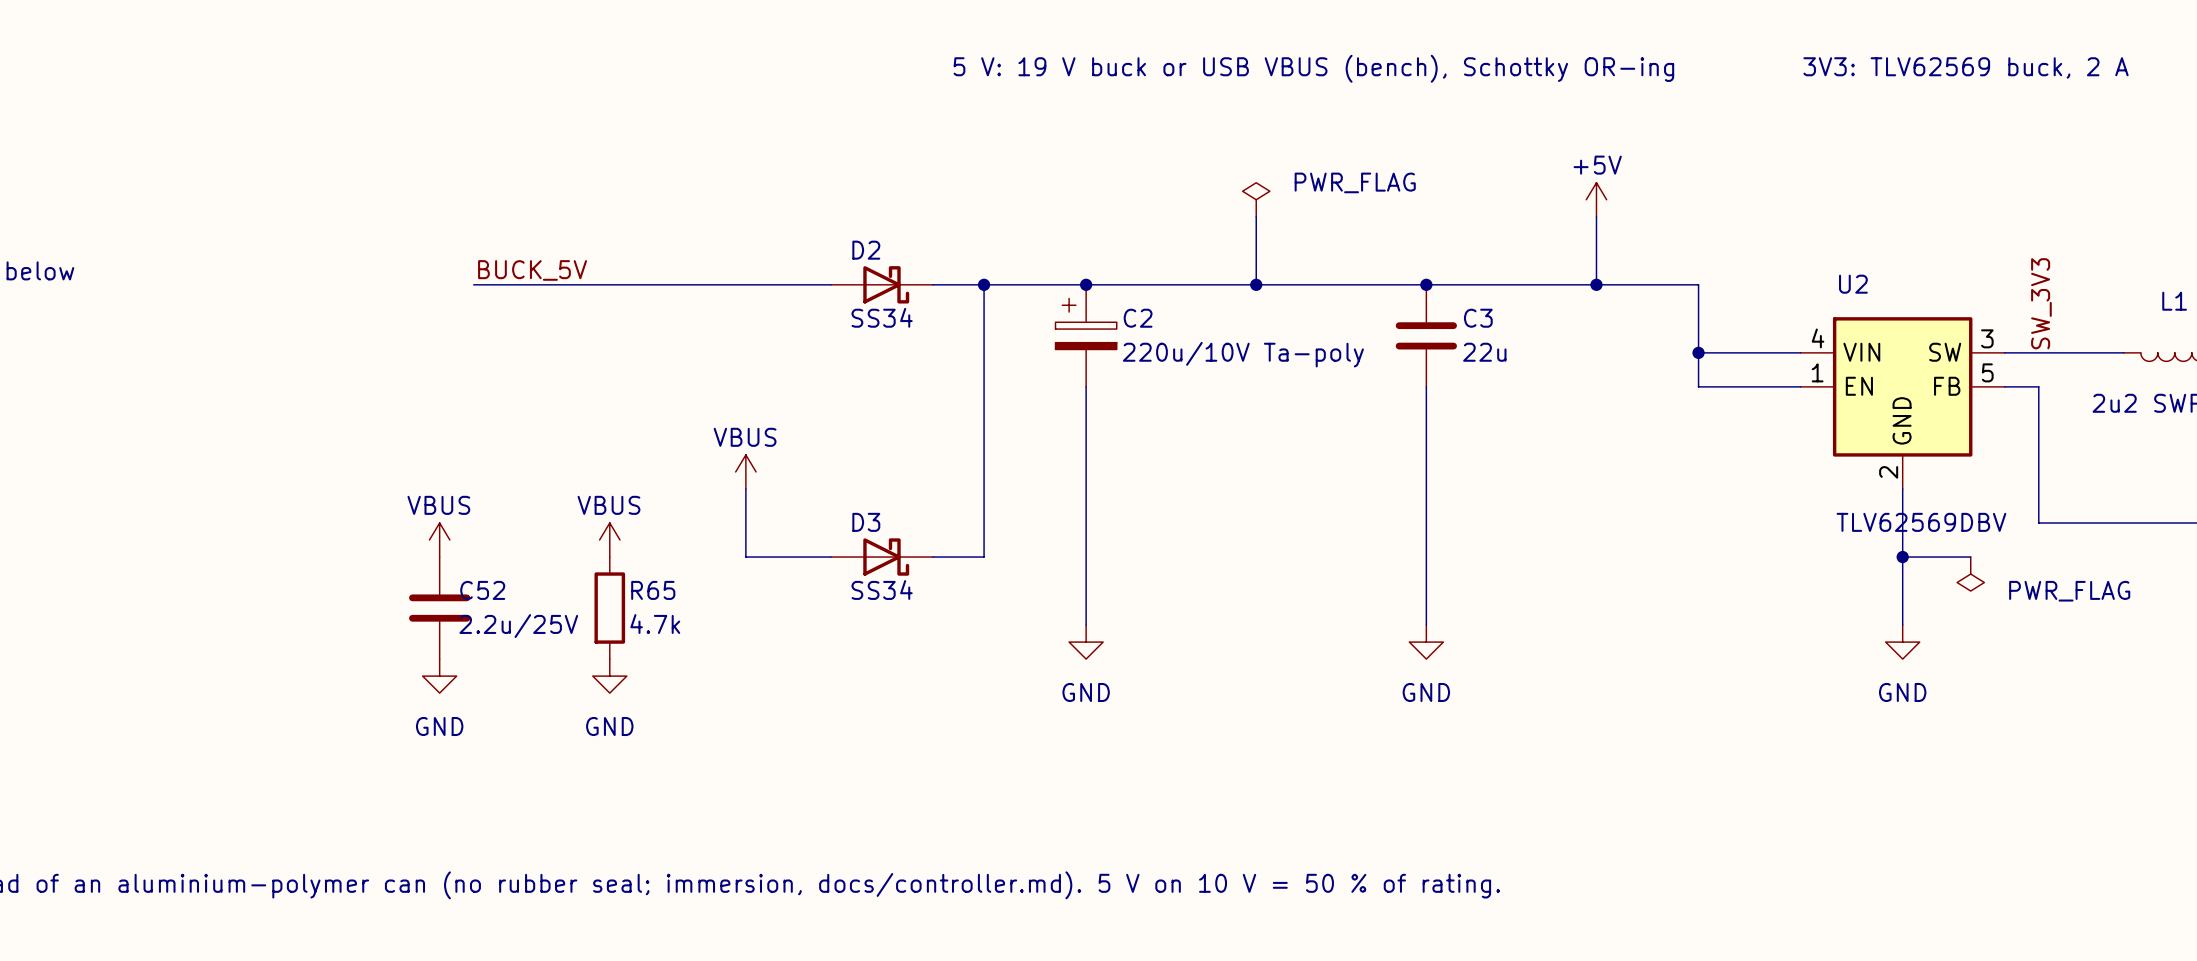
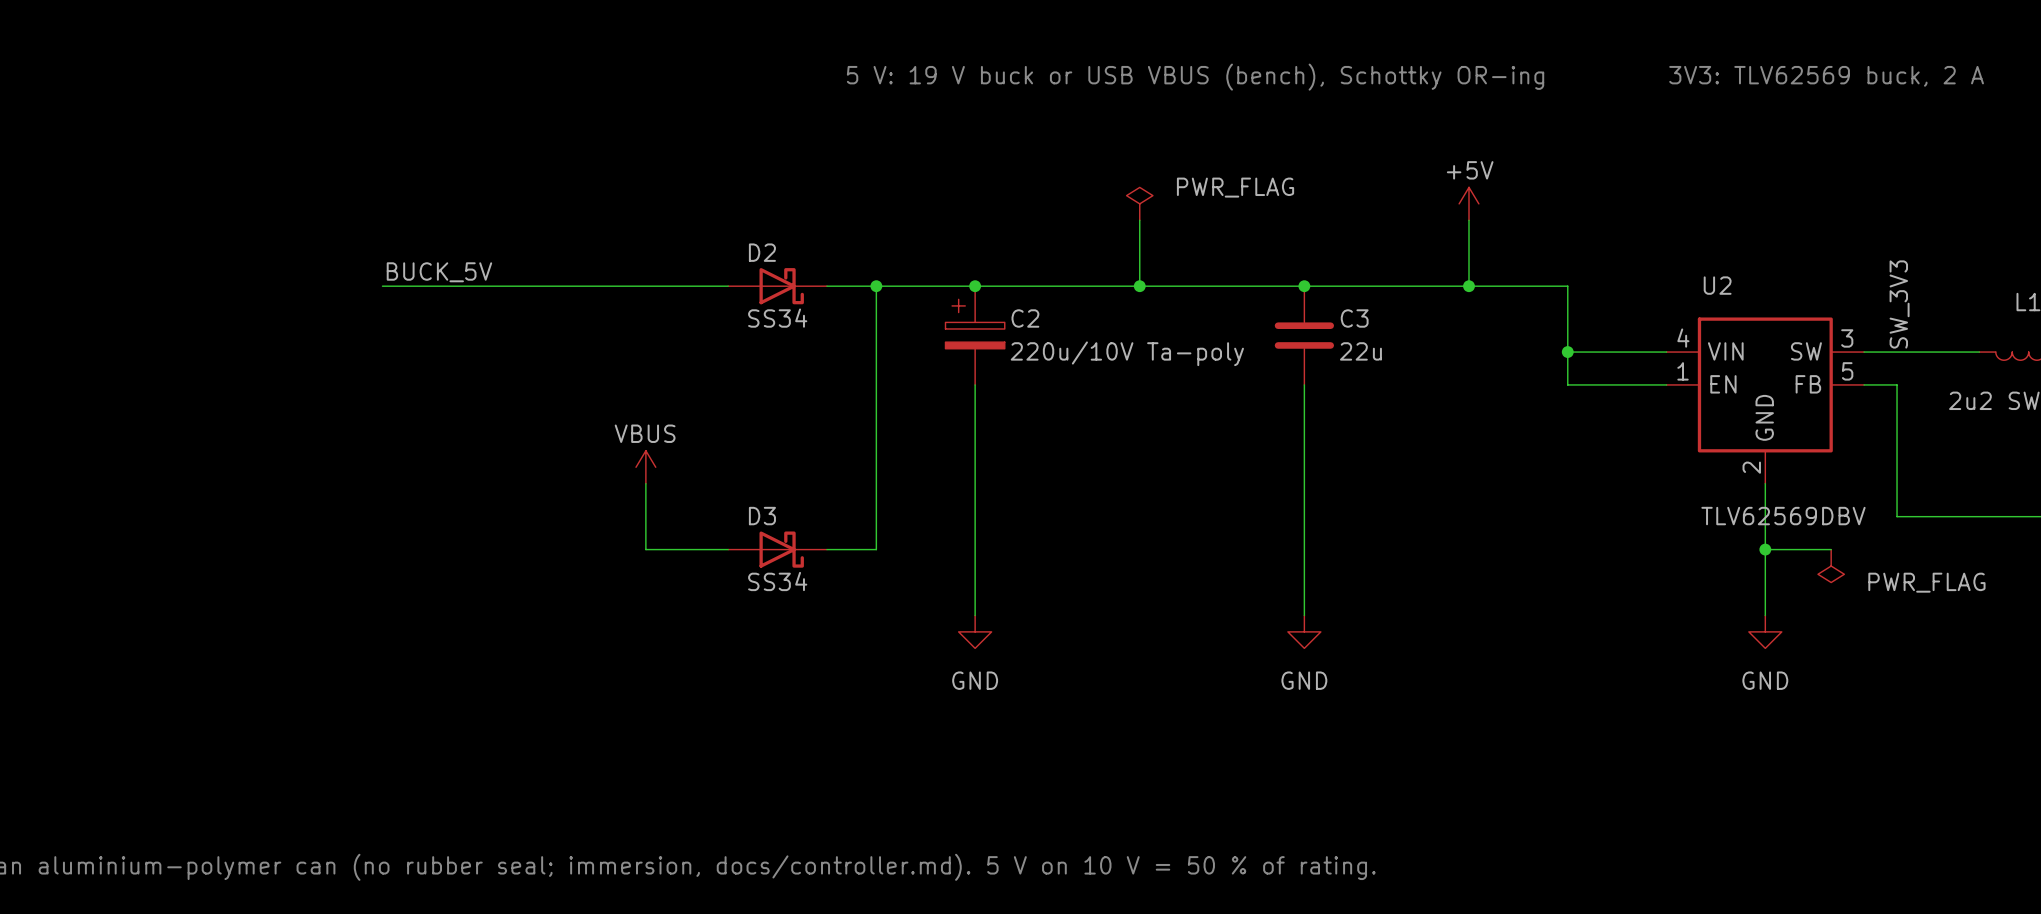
power symbol: VBUS (439, 540) -> none
power symbol: VBUS (609, 540) -> none
C52: 2.2u/25V (439, 608) -> none
R65: 4.7k (609, 608) -> none
power symbol: GND (439, 676) -> none
power symbol: GND (609, 676) -> none

